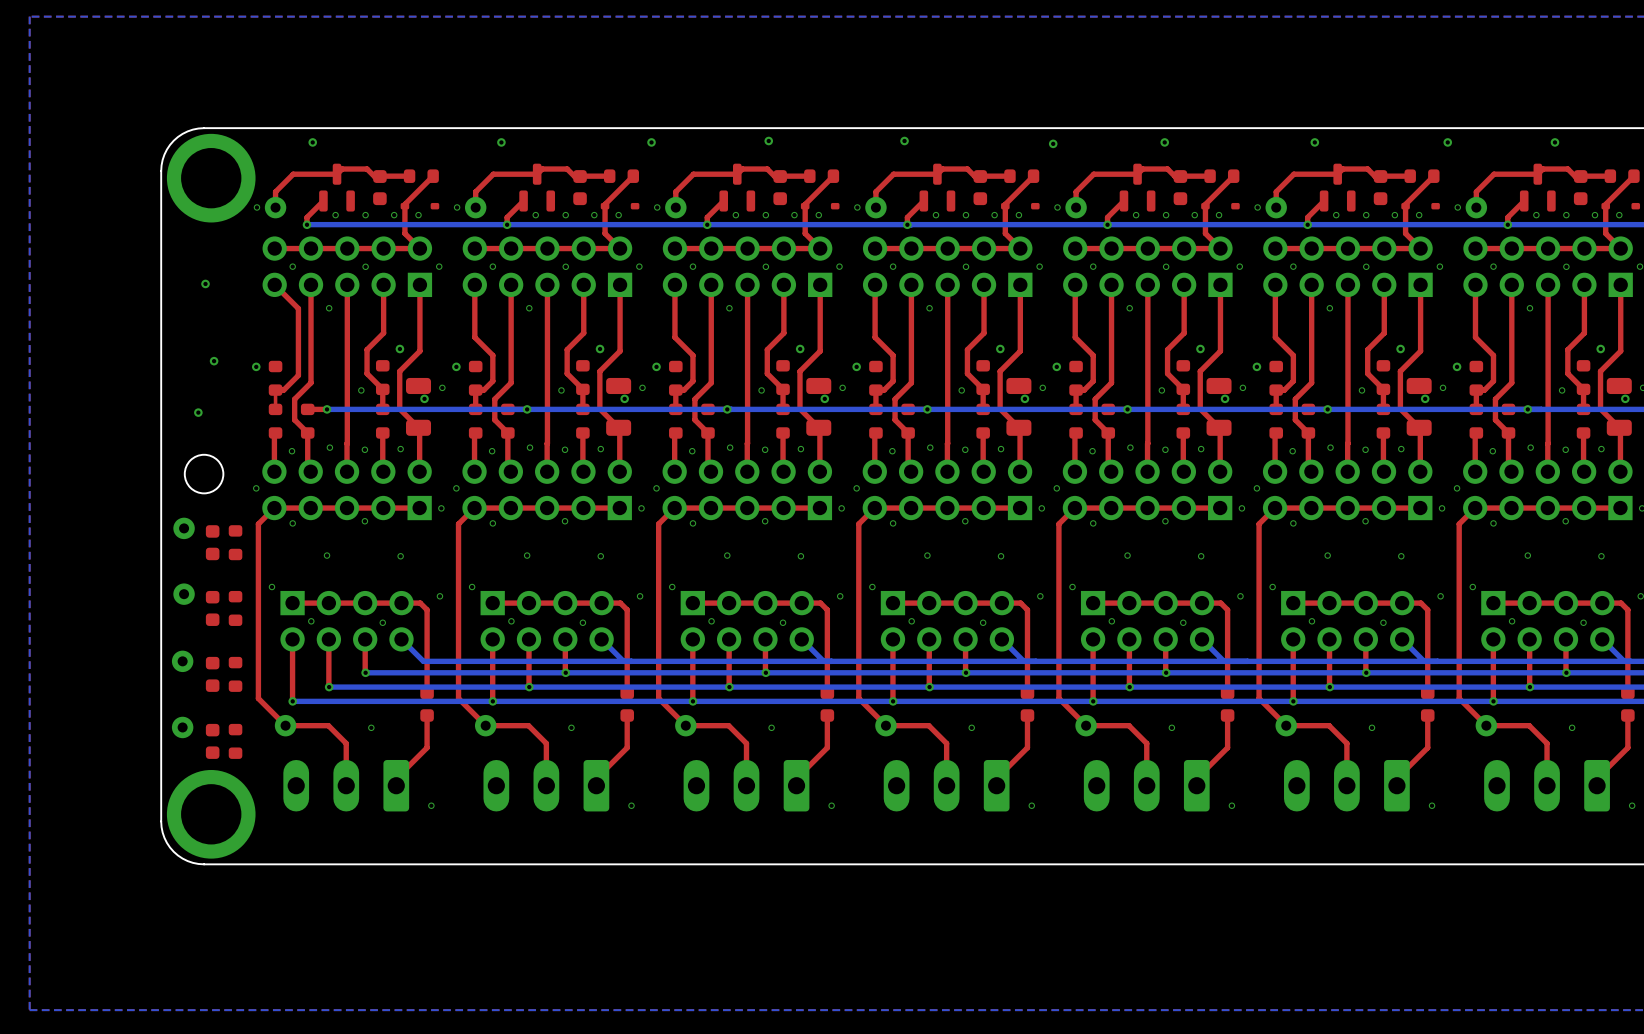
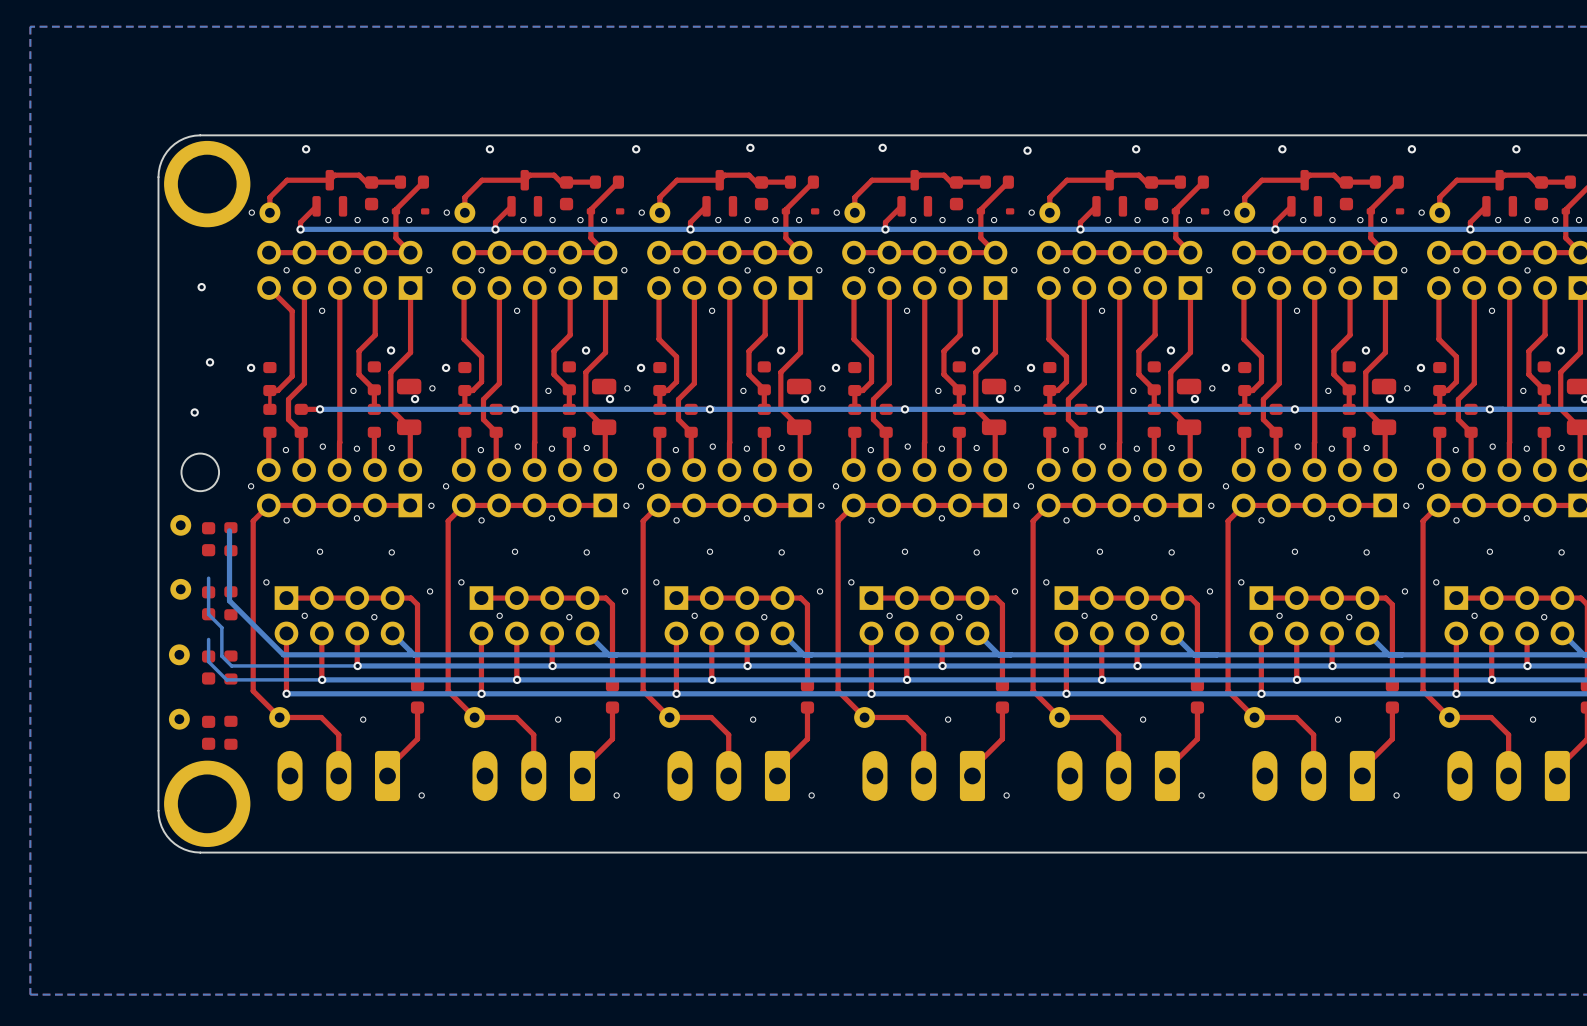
bottom track: none -> (229, 530) (229, 600) (283, 654) (413, 654)
bottom track: none -> (208, 578) (208, 614) (221, 627) (221, 656) (231, 665) (357, 665)
bottom track: none -> (208, 639) (208, 661) (226, 679) (322, 679)

